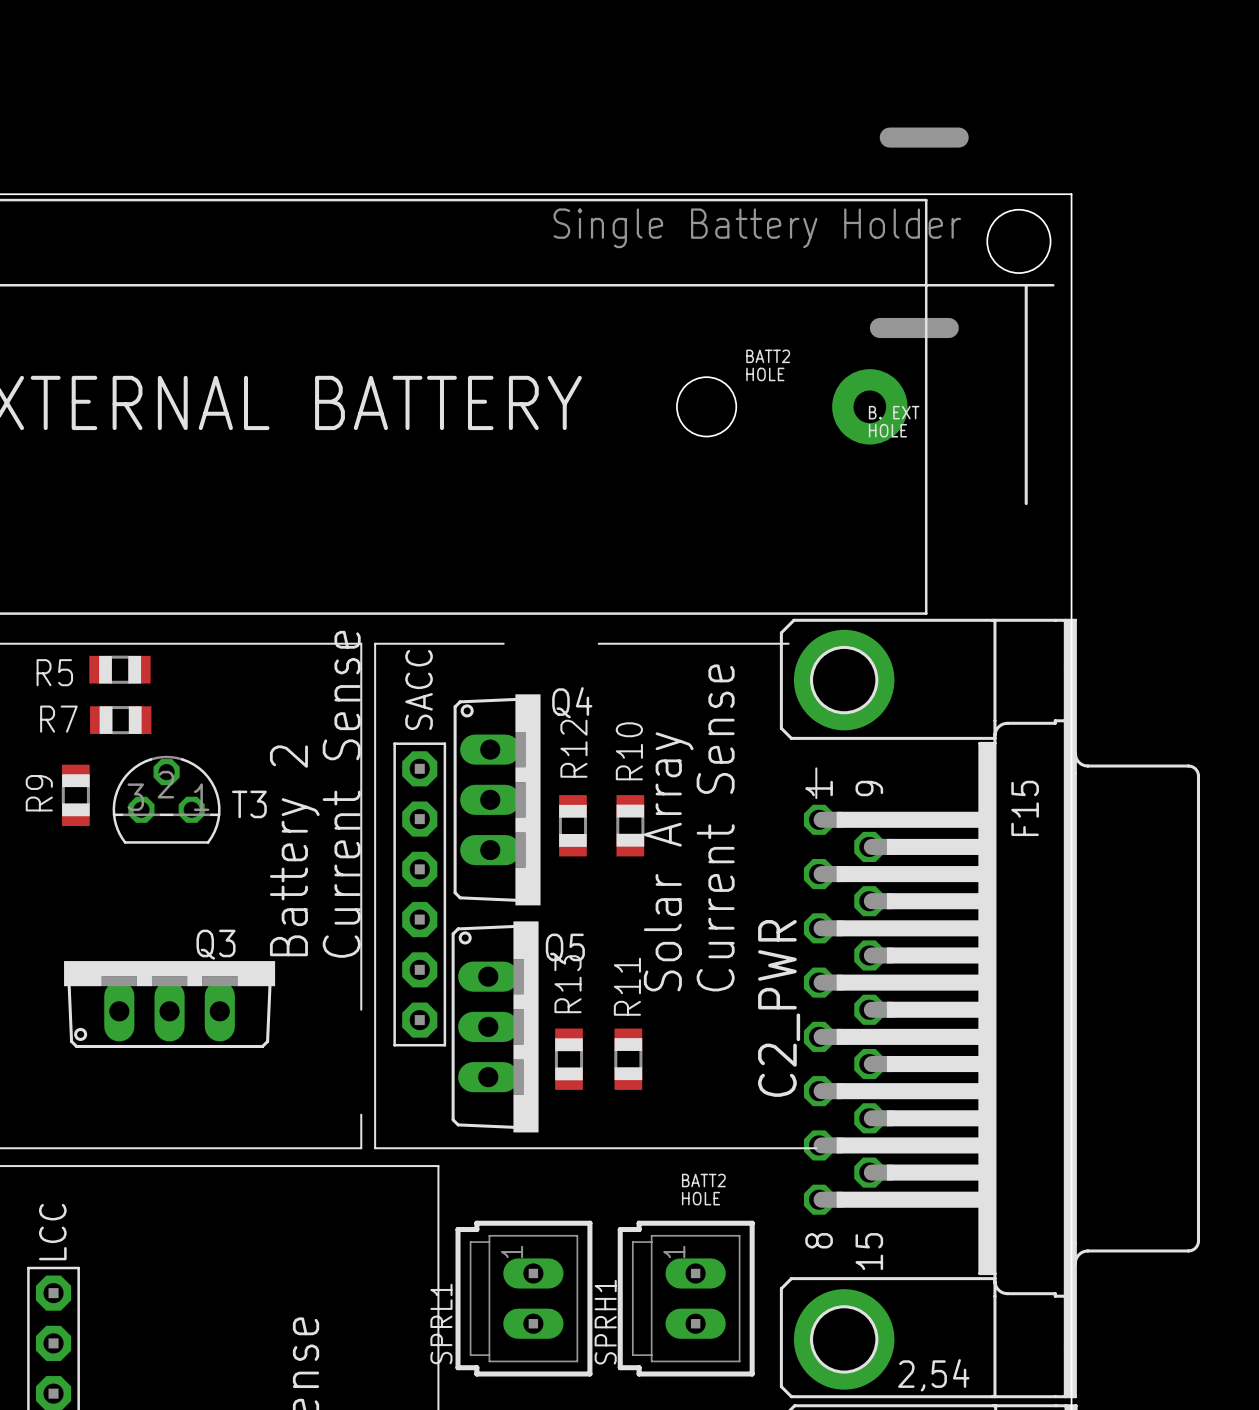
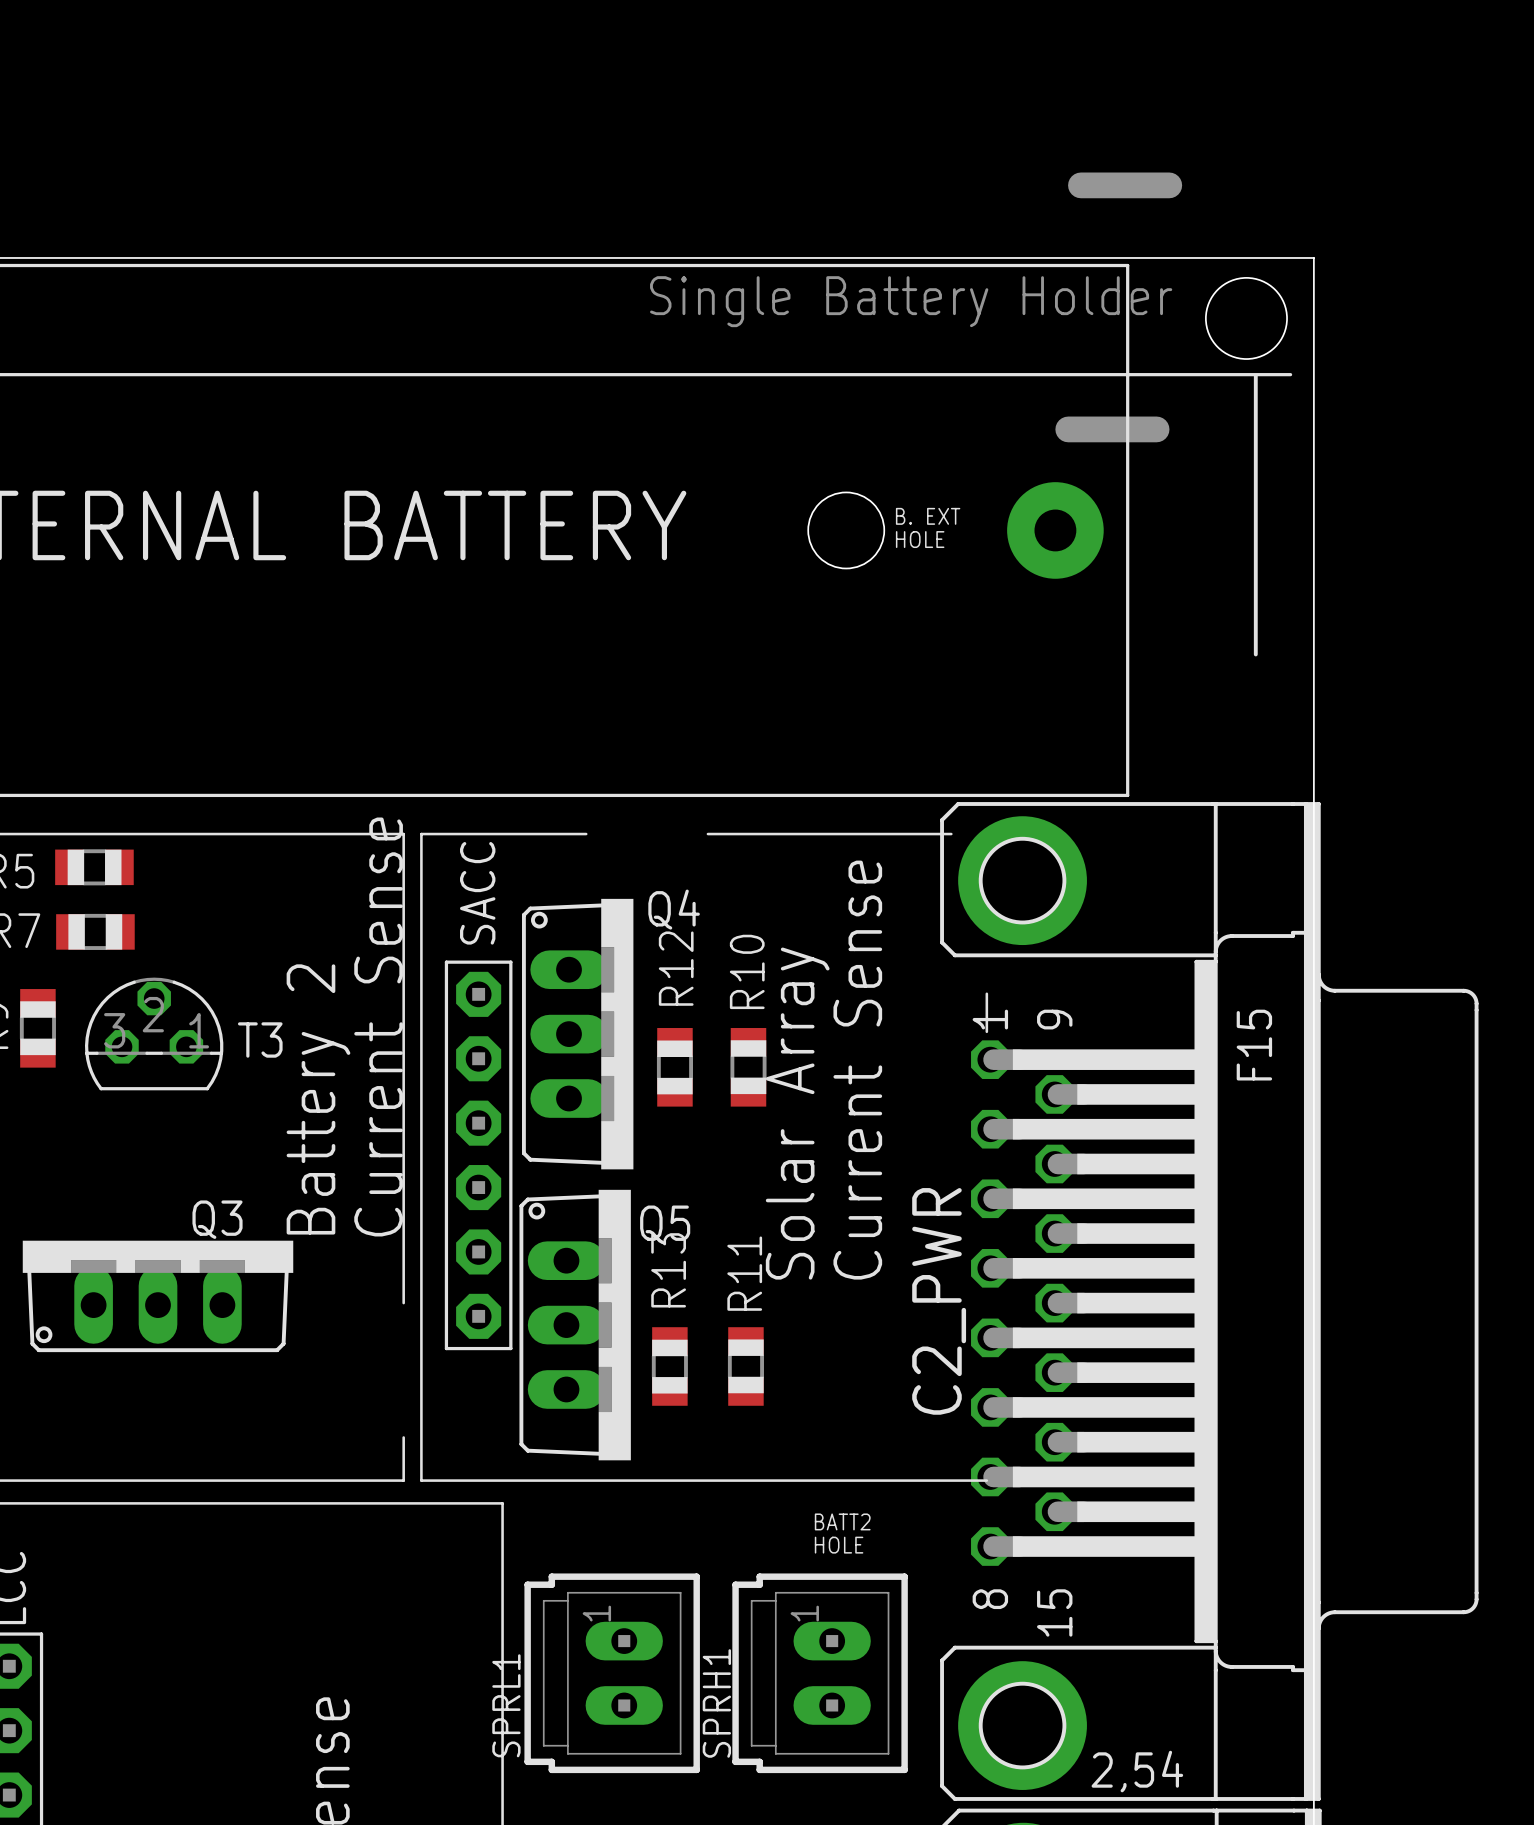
text: BATT2 (768, 356) -> none
text position: HOLE (765, 374) -> HOLE (920, 539)
text position: B. EXT (894, 412) -> B. EXT (928, 516)
text: HOLE (887, 430) -> none

